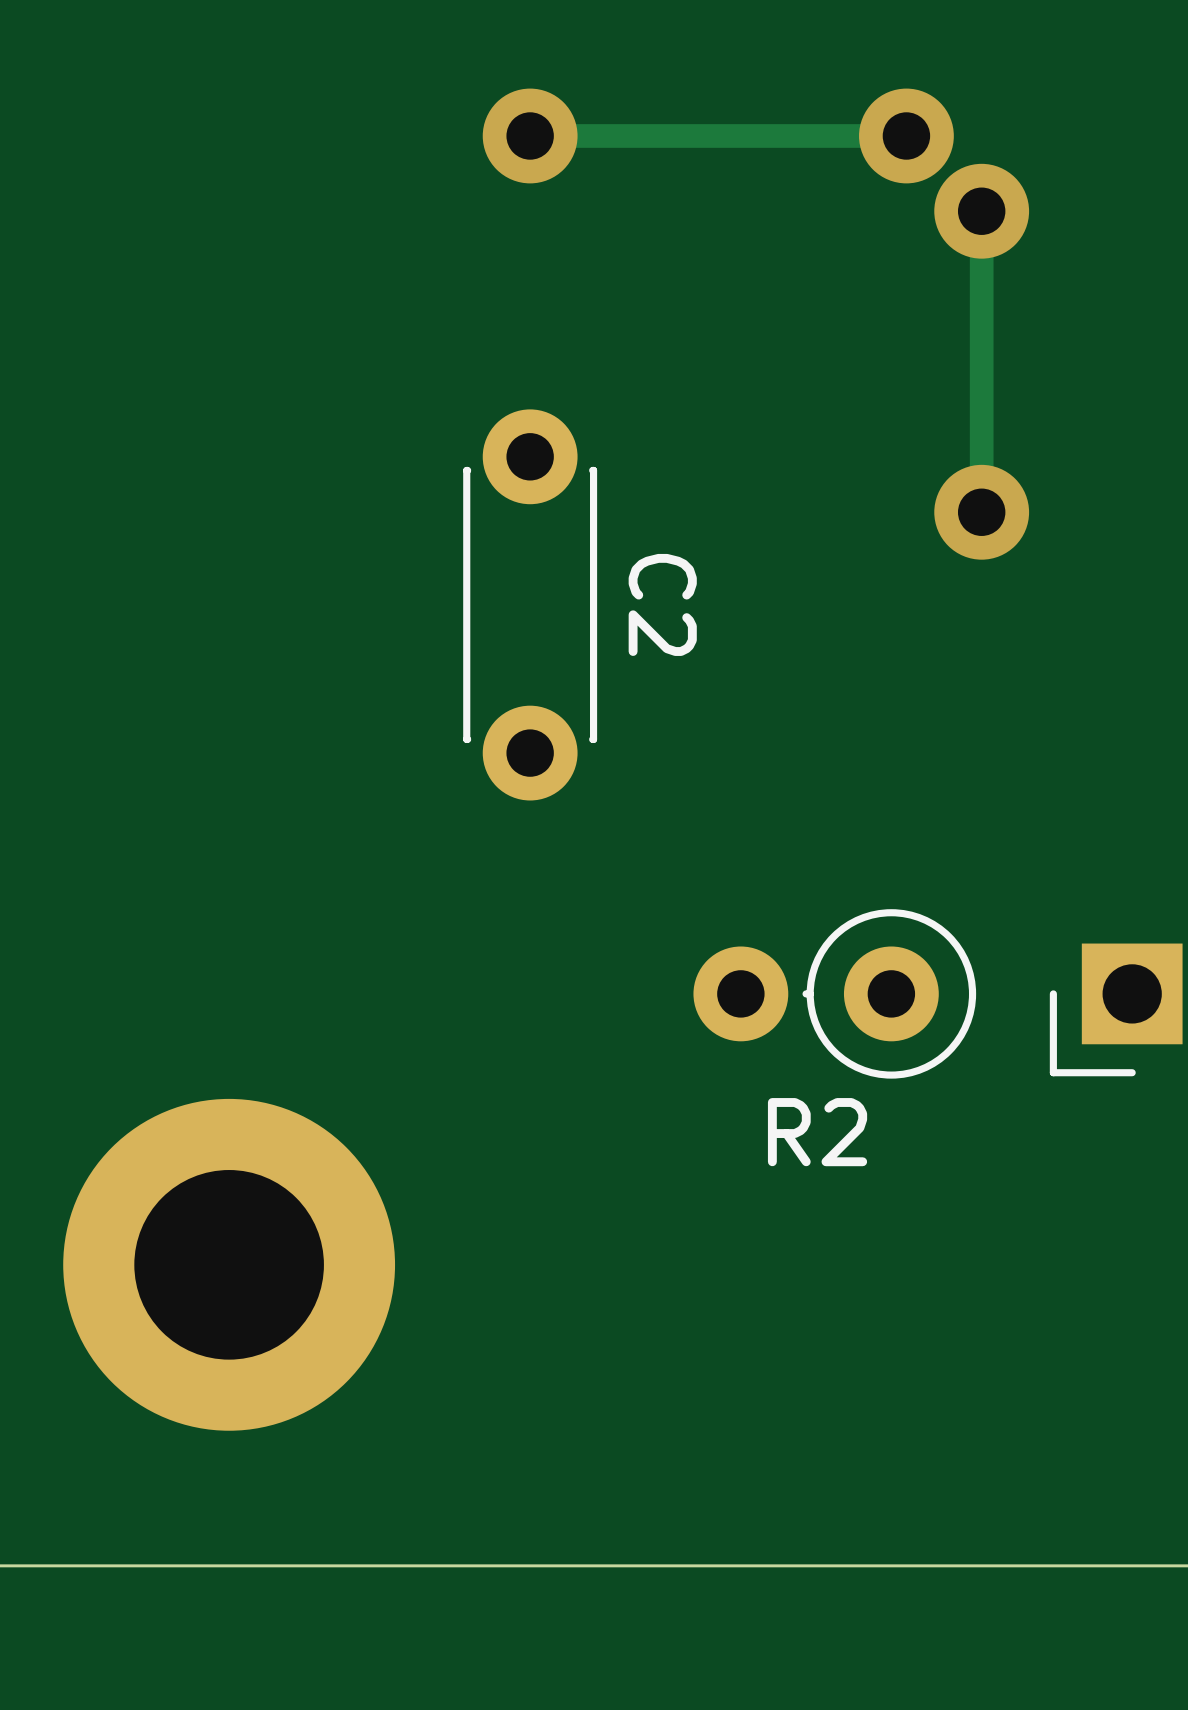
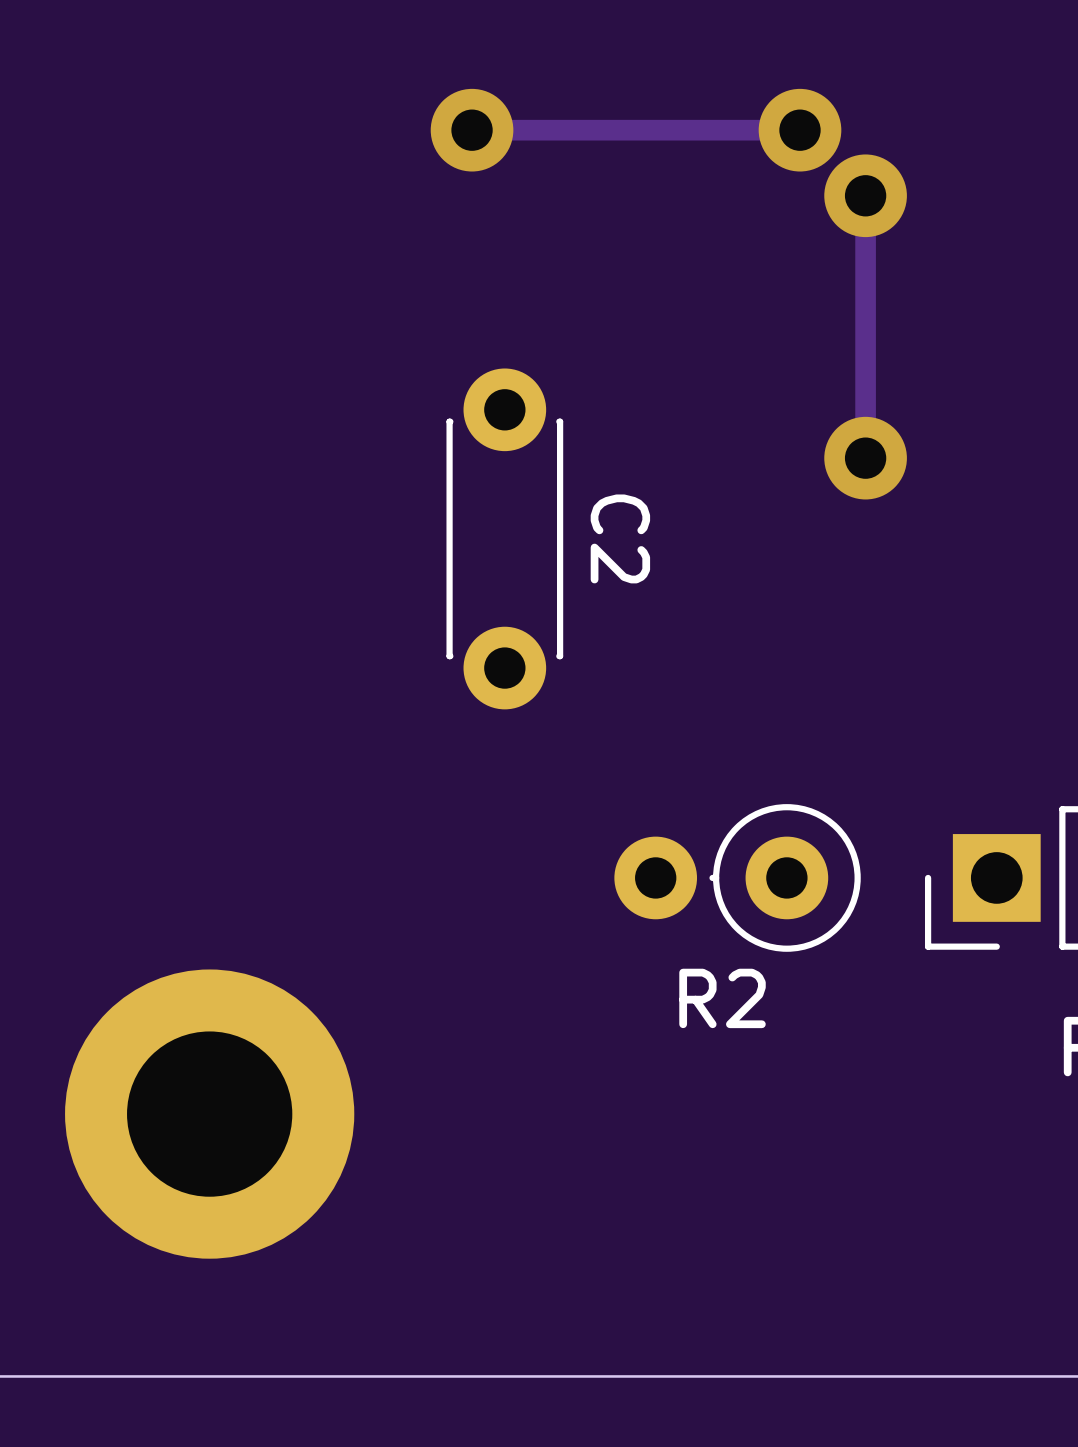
C2 position: (530, 604) -> (504, 538)

